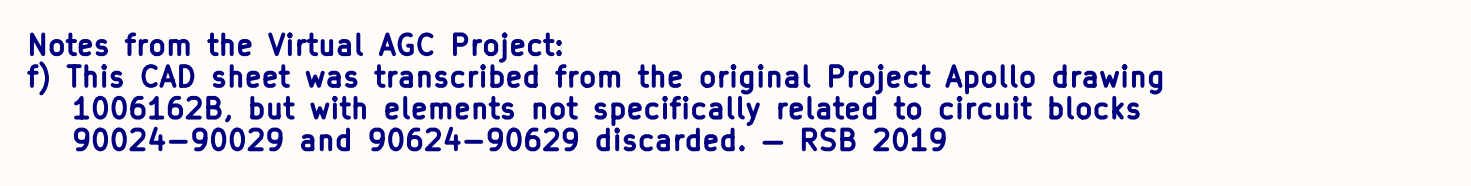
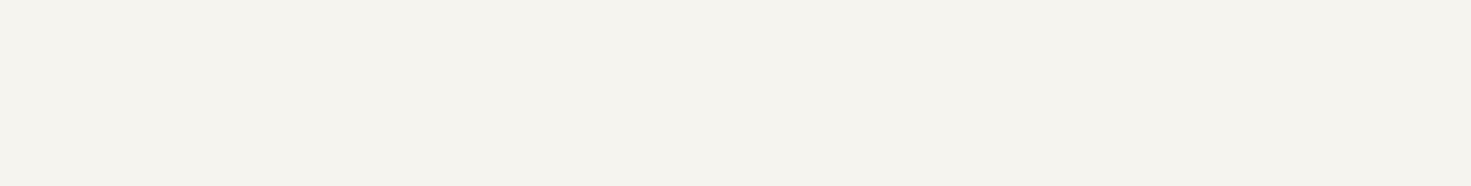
text: Notes from the Virtual AGC Project: (295, 47) -> none
text: f) This CAD sheet was transcribed from the original Project Apollo drawing (594, 78) -> none
text: 1006162B, but with elements not specifically related to circuit blocks (606, 111) -> none
text: 90024-90029 and 90624-90629 discarded. — RSB 2019 (509, 138) -> none

